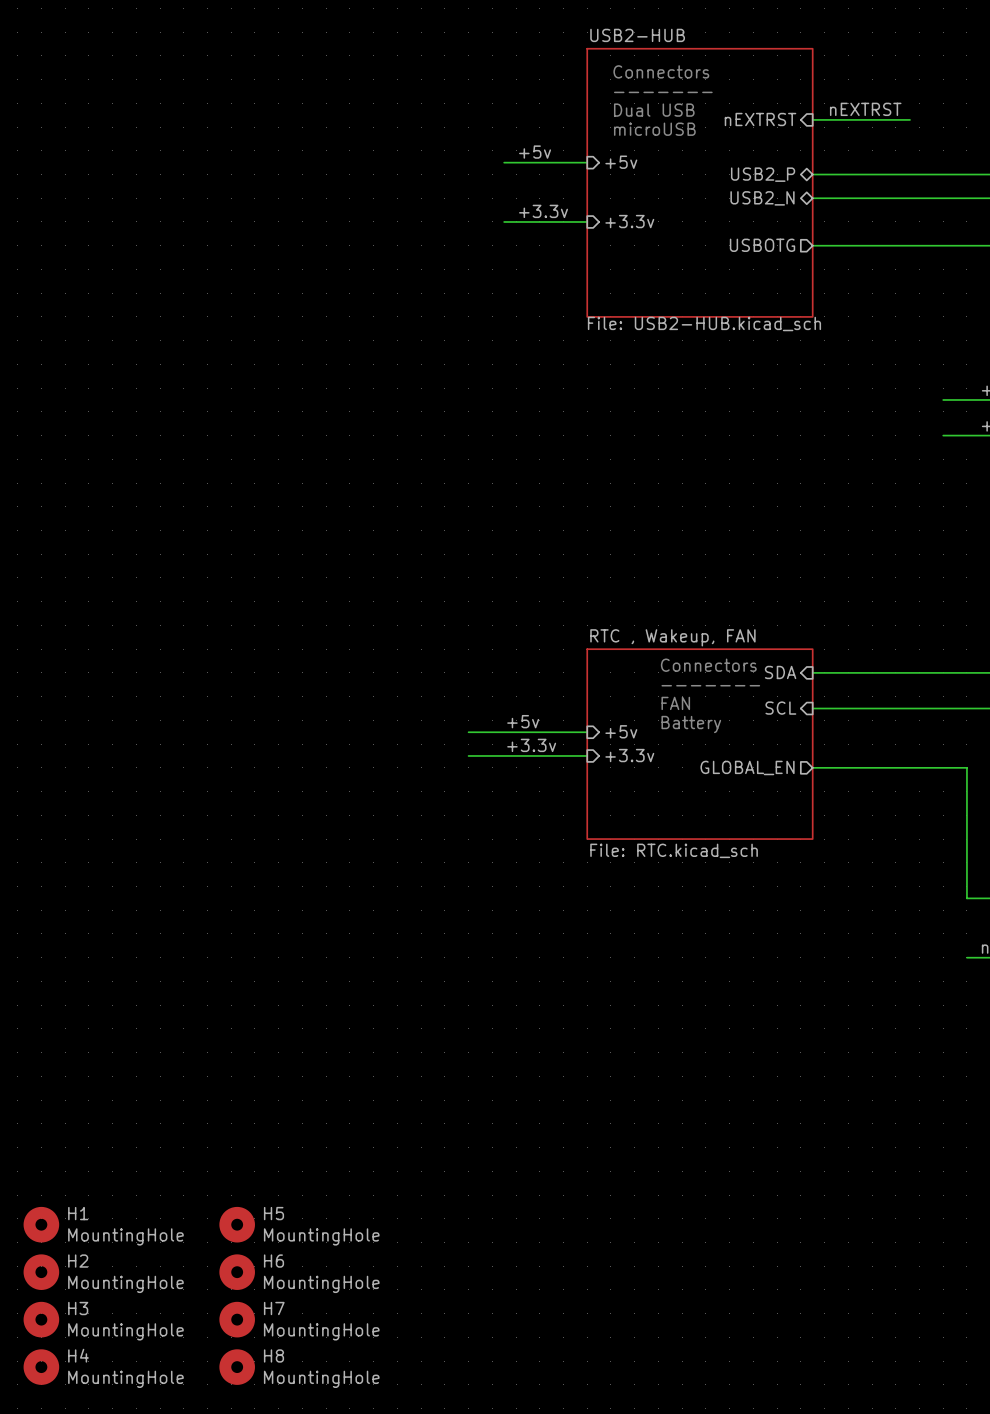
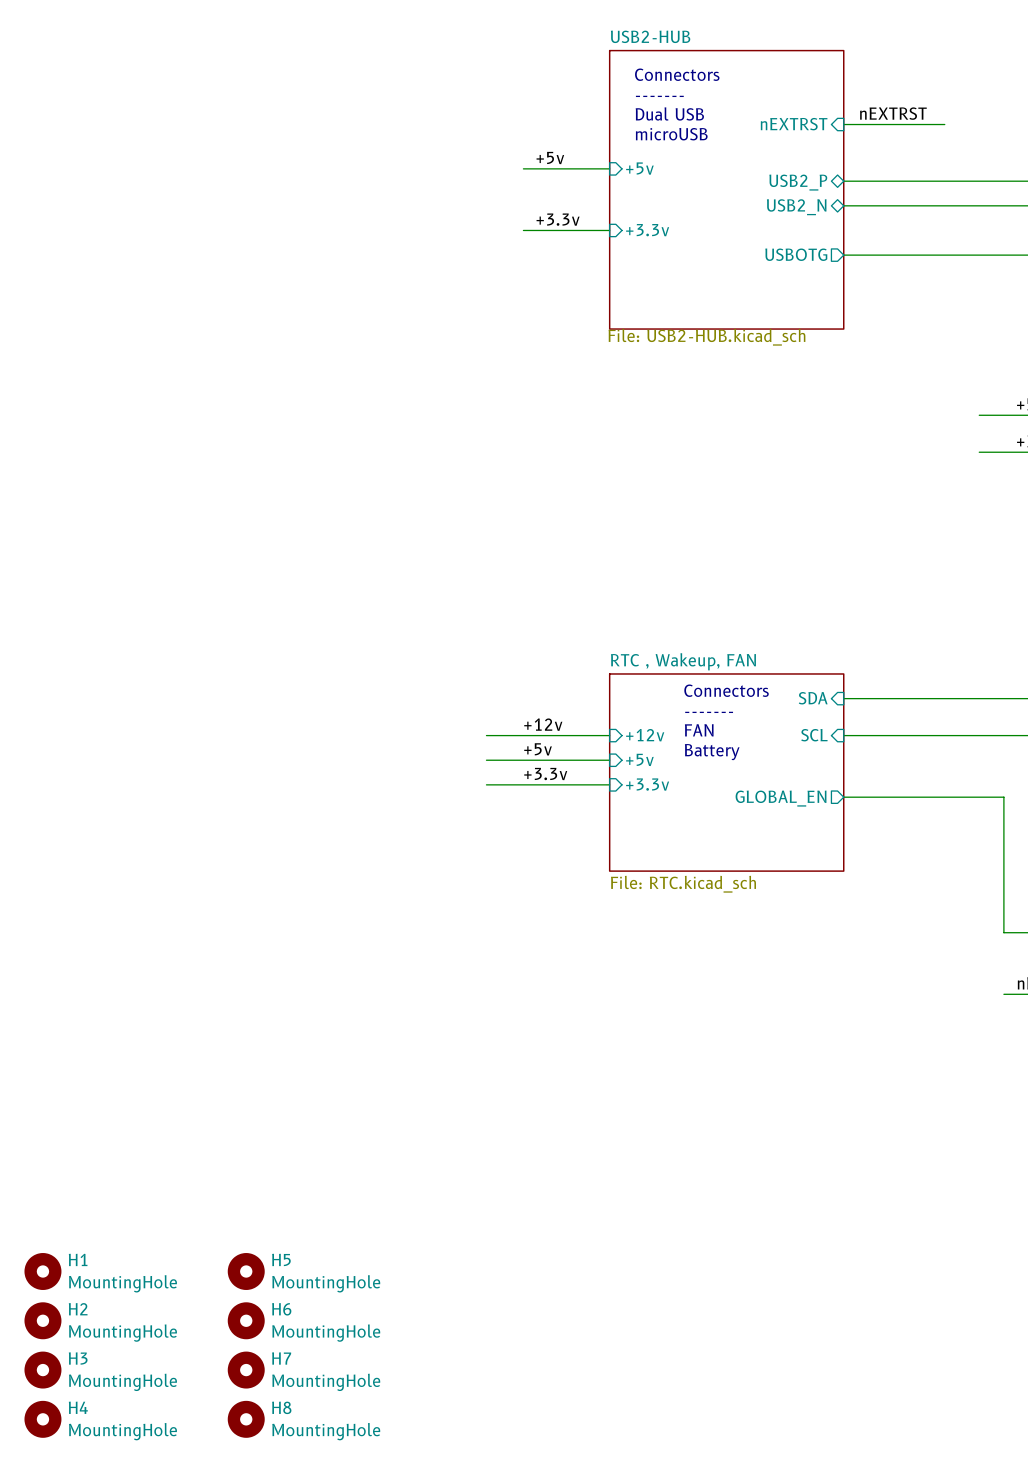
label: none -> +12v (543, 724)
wire: none -> (486, 735) (609, 735)
sheet pin: none -> +12v (645, 735)

